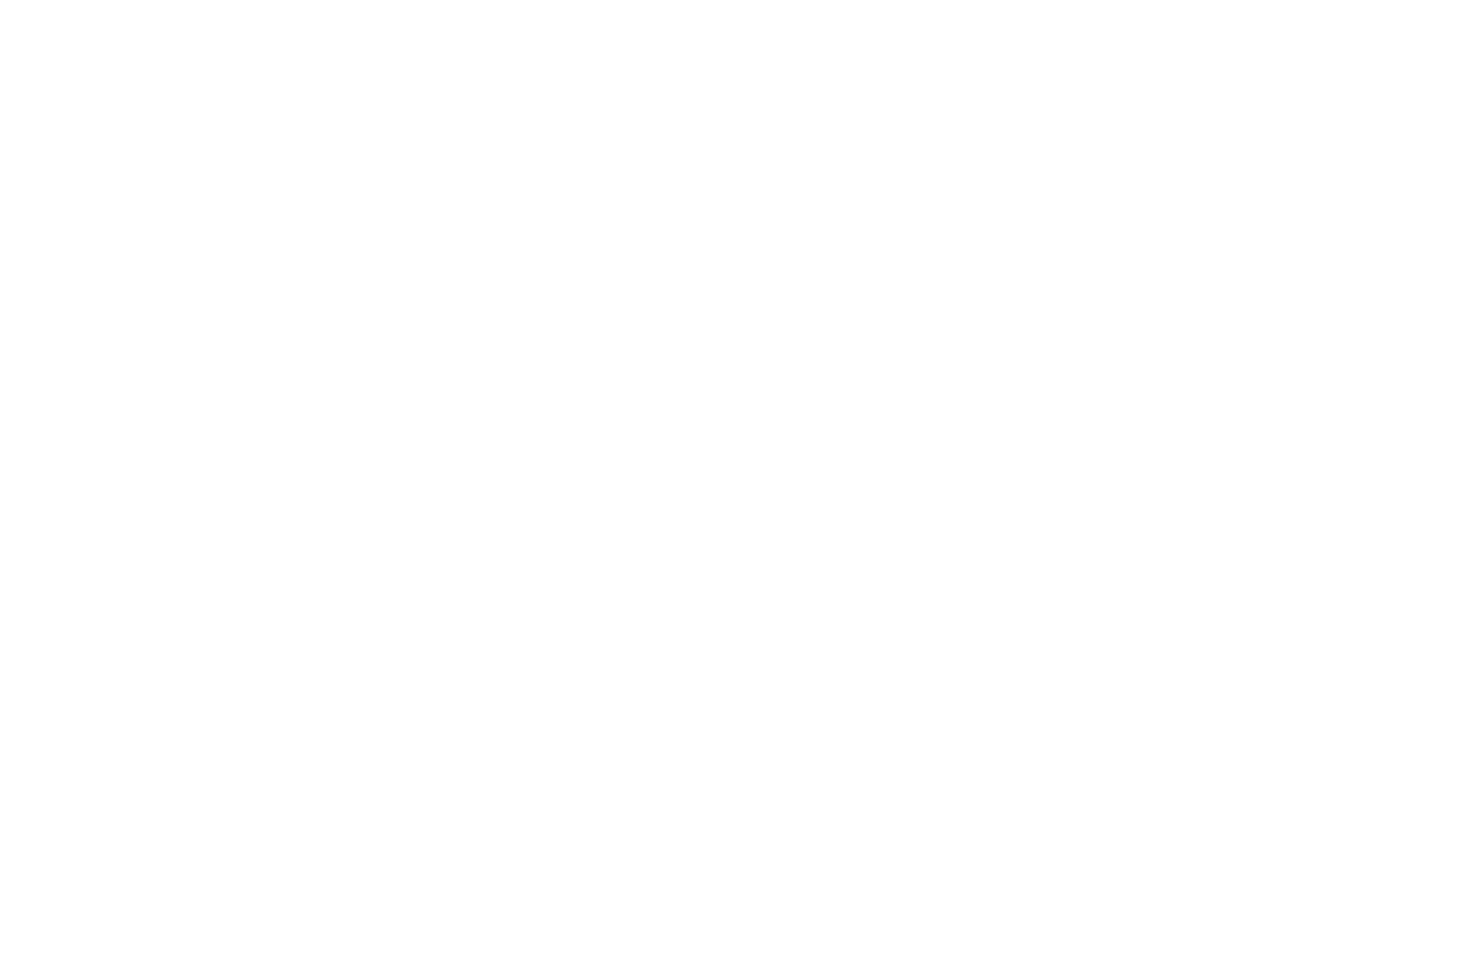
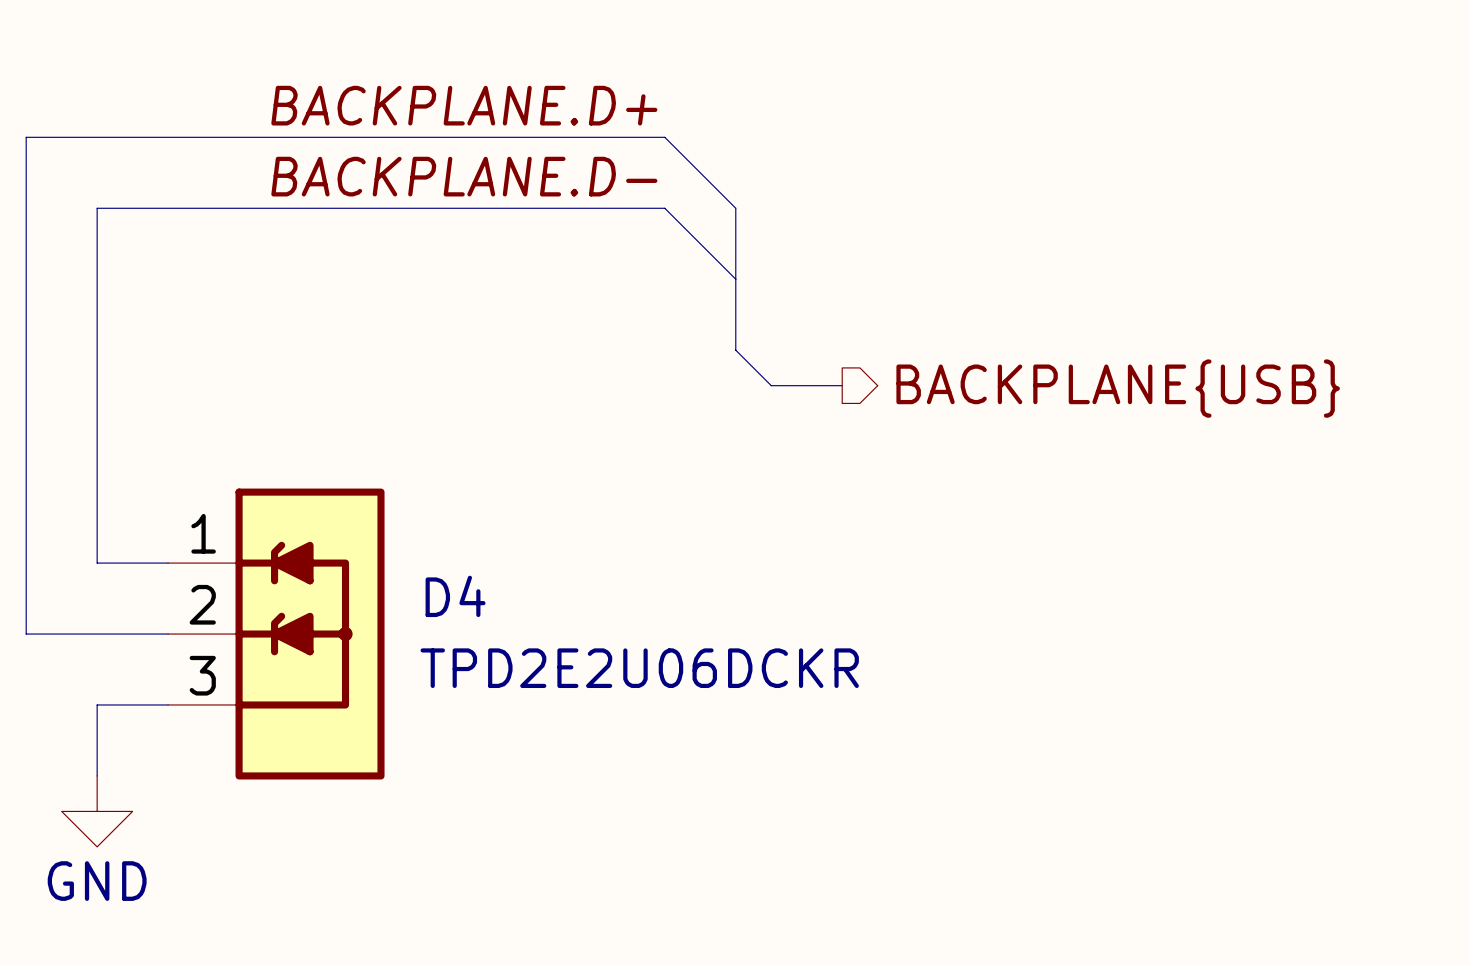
label: none -> BACKPLANE.D+ (464, 105)
label: none -> BACKPLANE.D- (464, 176)
wire: none -> (735, 208) (664, 137) (26, 137) (26, 634) (168, 634)
bus: none -> (735, 208) (735, 350) (771, 385) (842, 385)
wire: none -> (735, 279) (664, 208) (97, 208) (97, 563) (168, 563)
hierarchical label: none -> BACKPLANE{USB} (1118, 388)
D4: none -> TPD2E2U06DCKR (276, 634)
wire: none -> (168, 704) (97, 704) (97, 775)
power symbol: none -> GND (97, 811)

